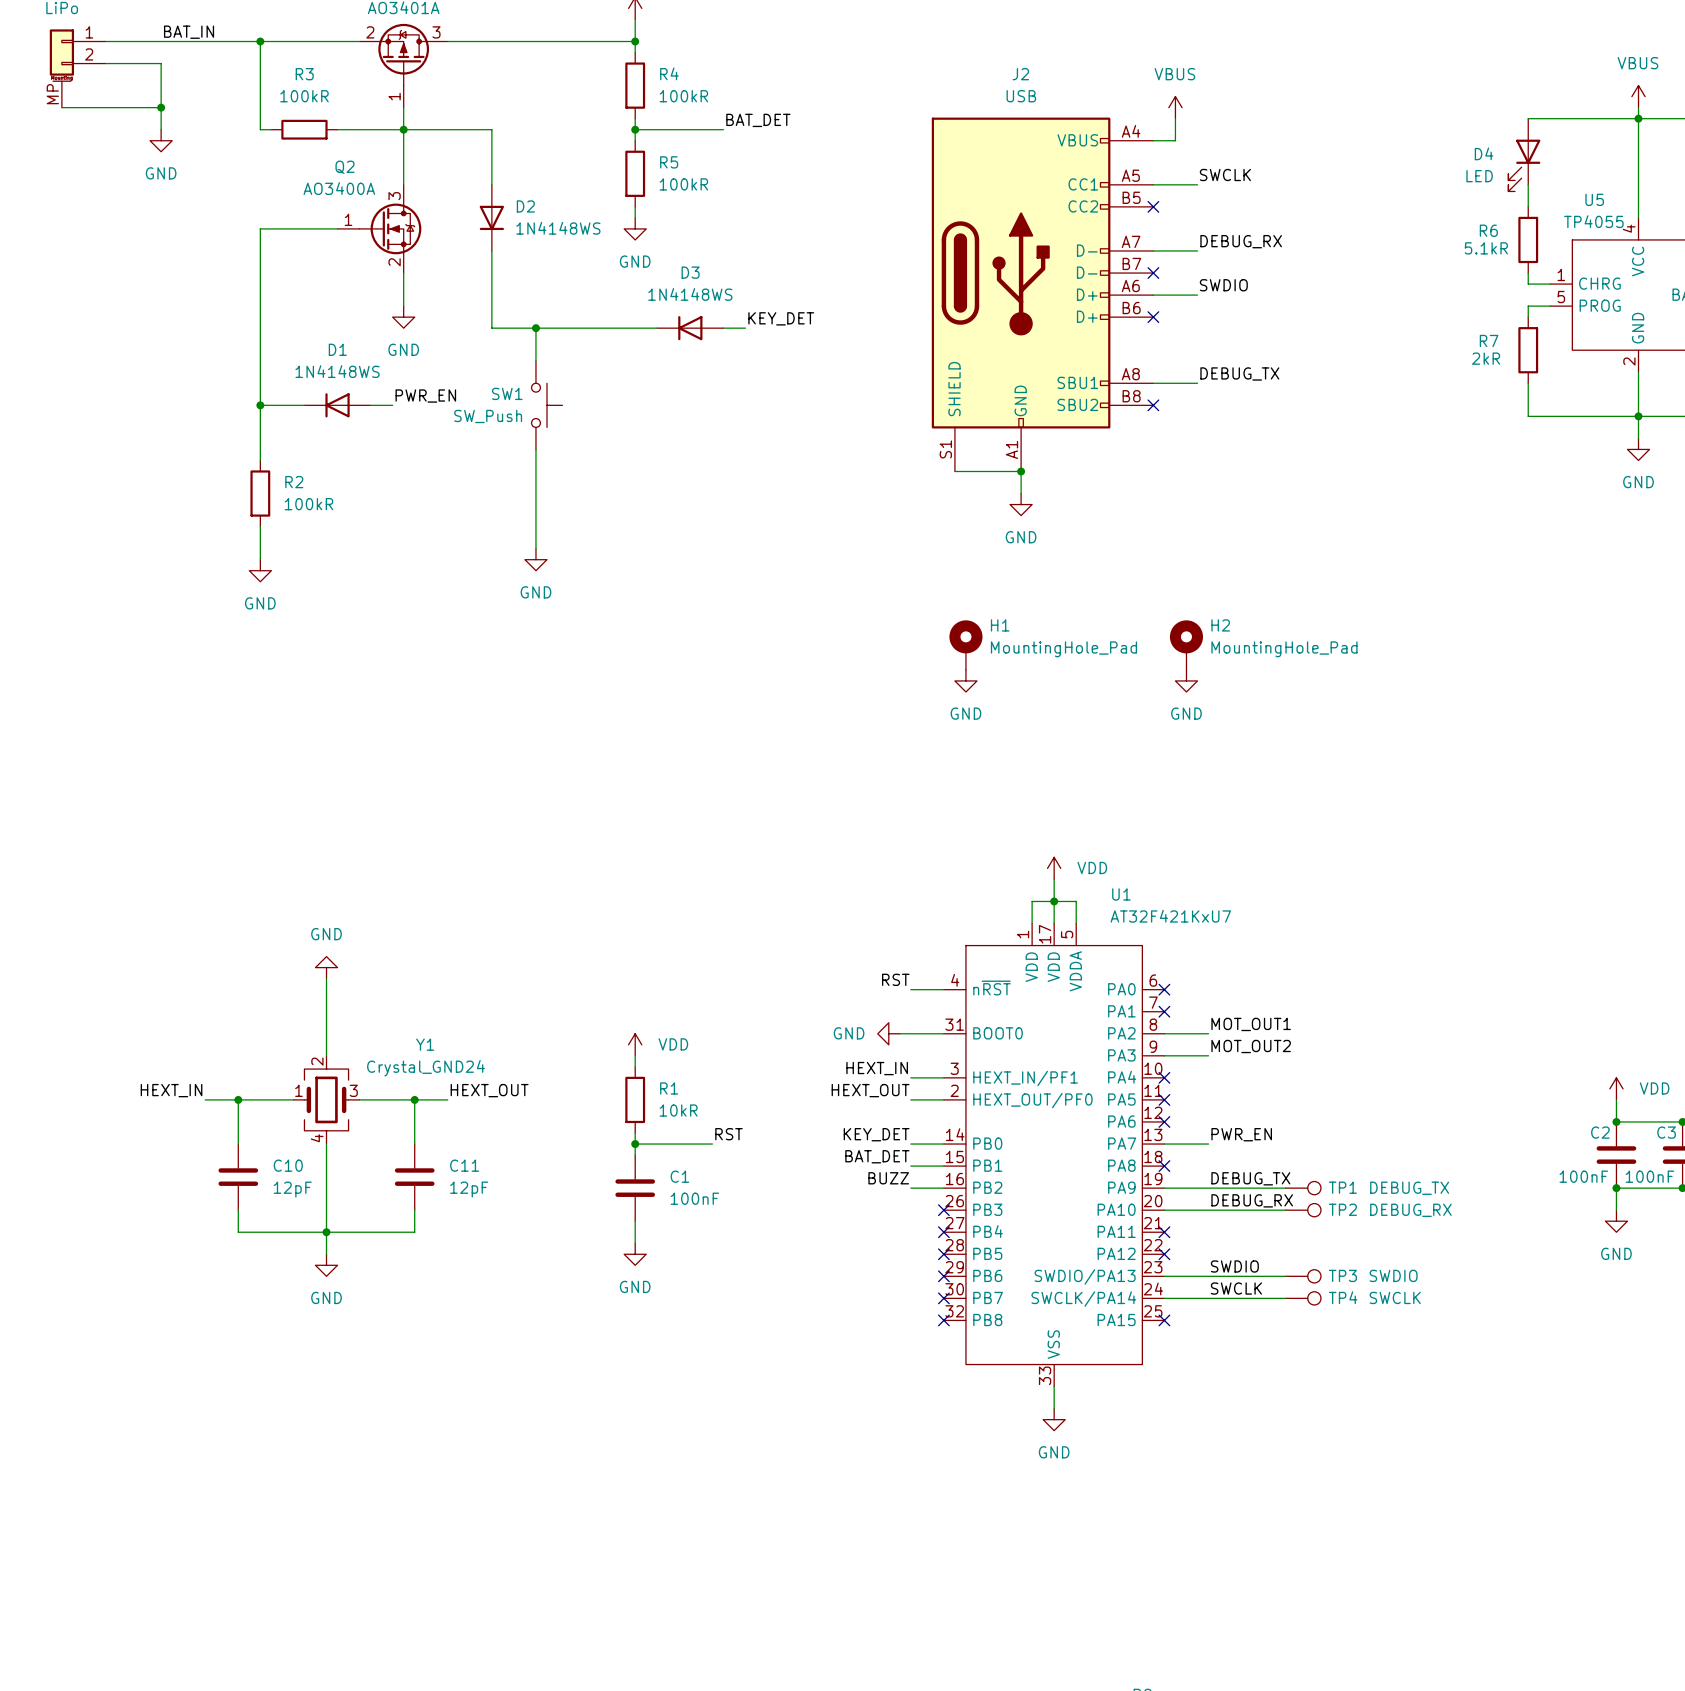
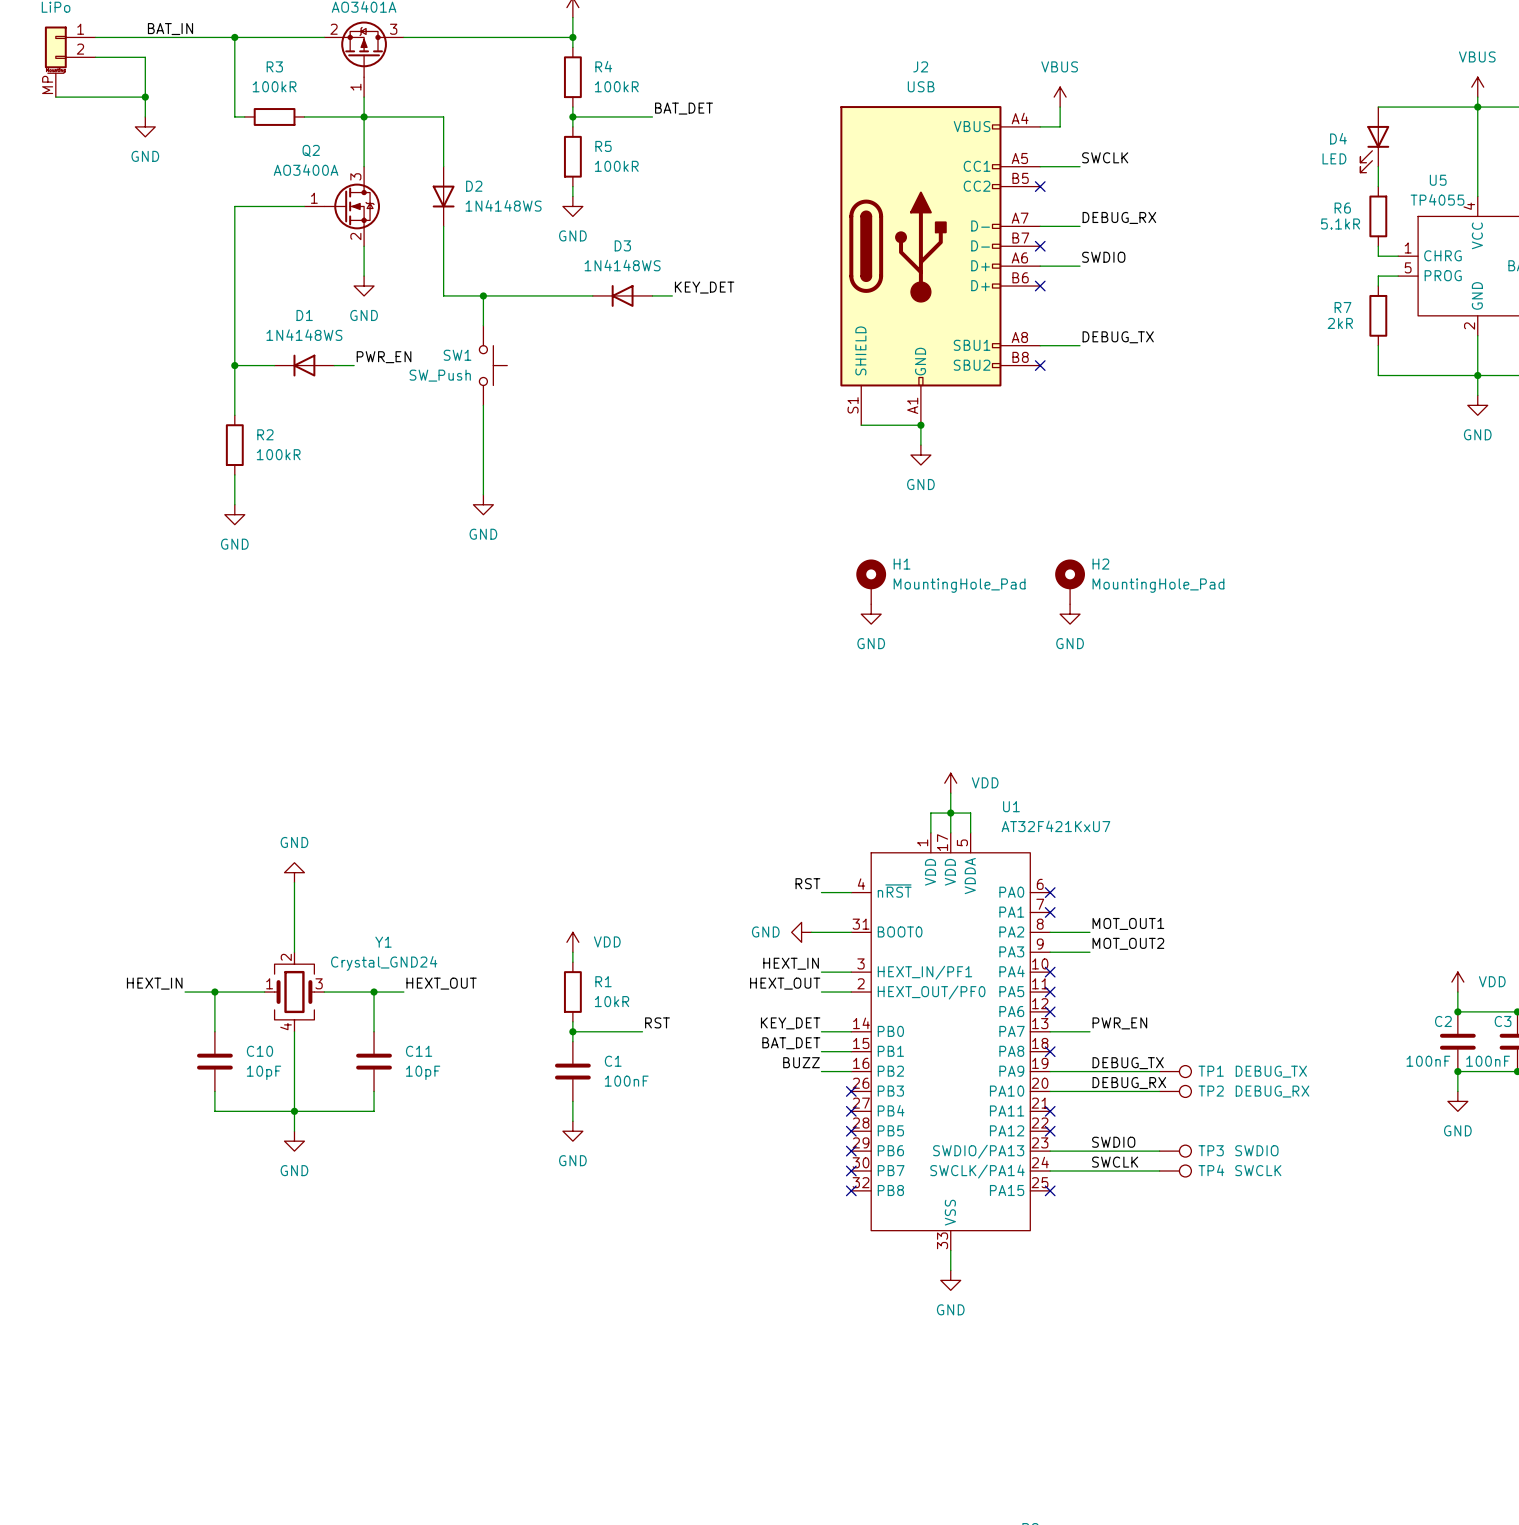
C10 value: 12pF (292, 1189) -> 10pF (264, 1072)
C11 value: 12pF (469, 1189) -> 10pF (423, 1072)

